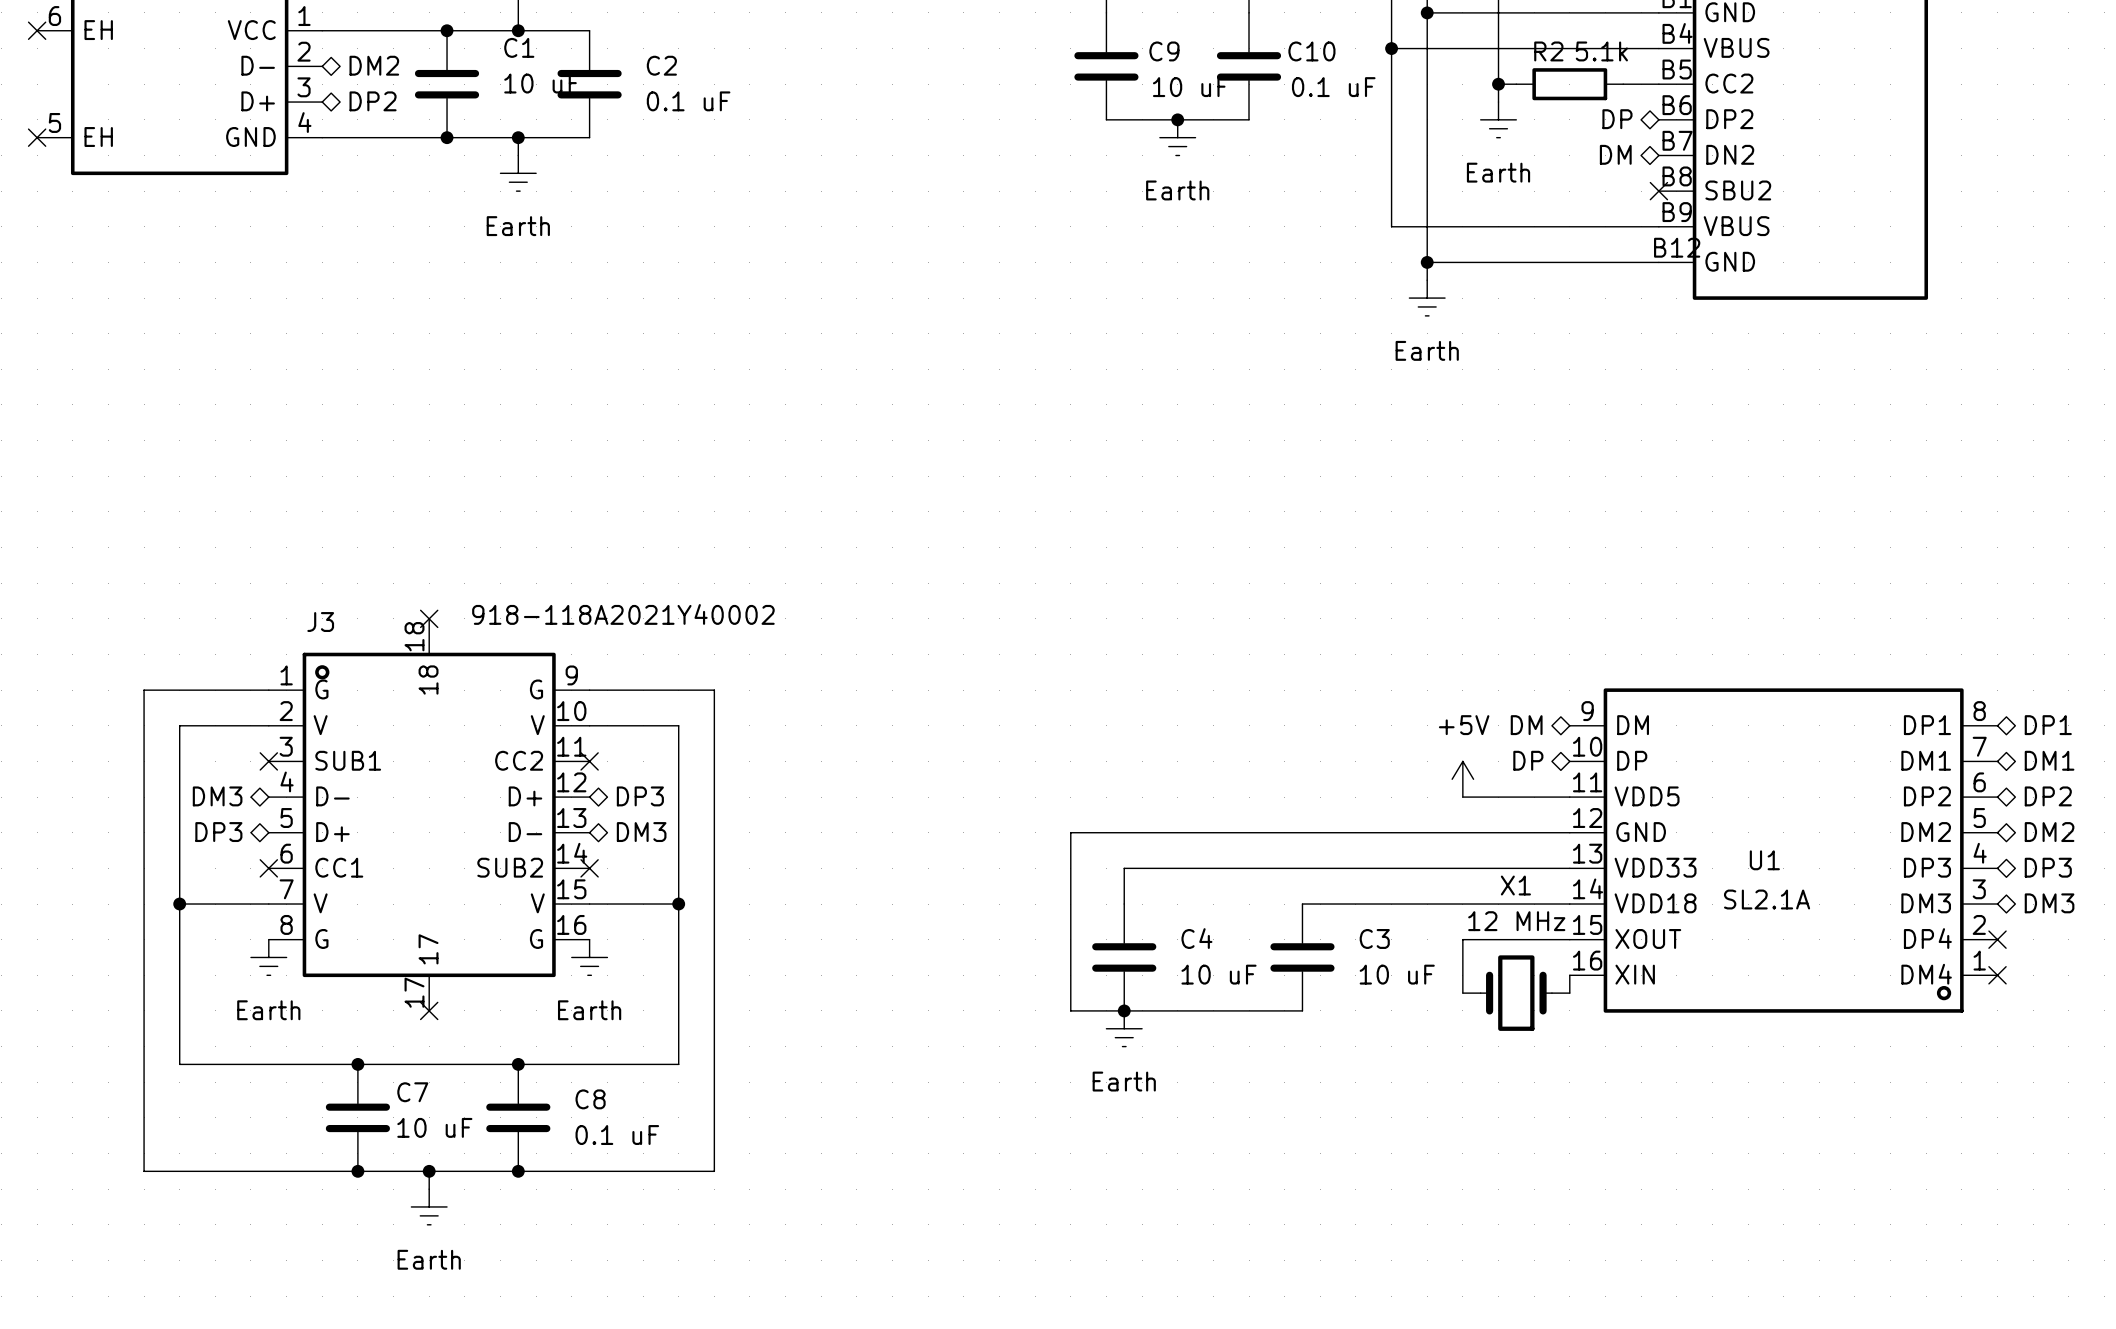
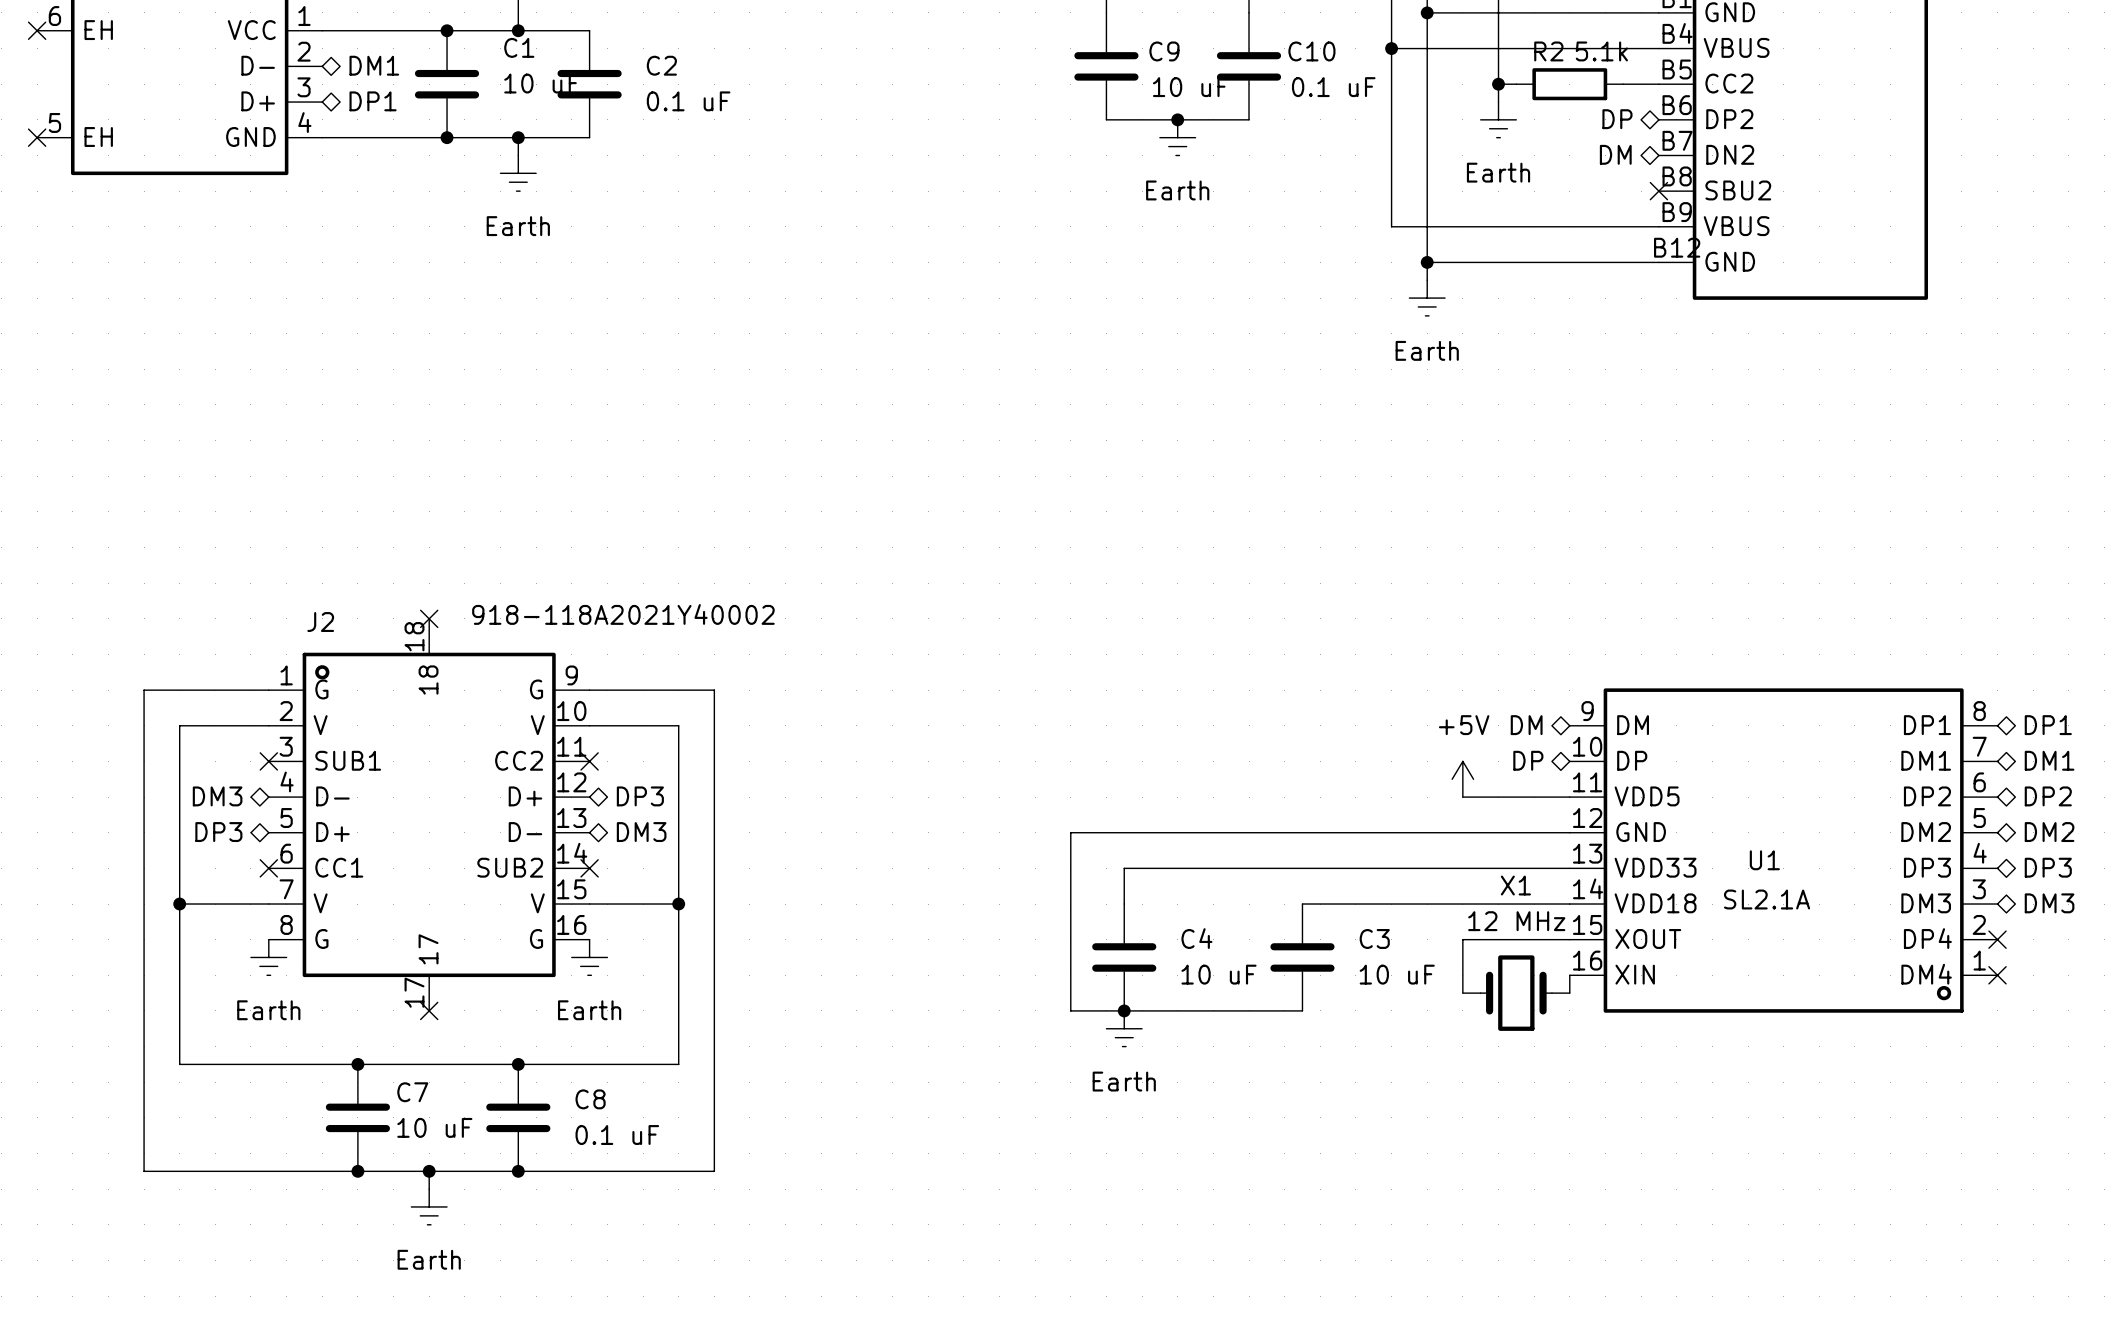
hierarchical label: DM2 (374, 65) -> DM1 (374, 65)
hierarchical label: DP2 (373, 101) -> DP1 (373, 101)
J3 name: J3 (320, 622) -> J2 (320, 622)

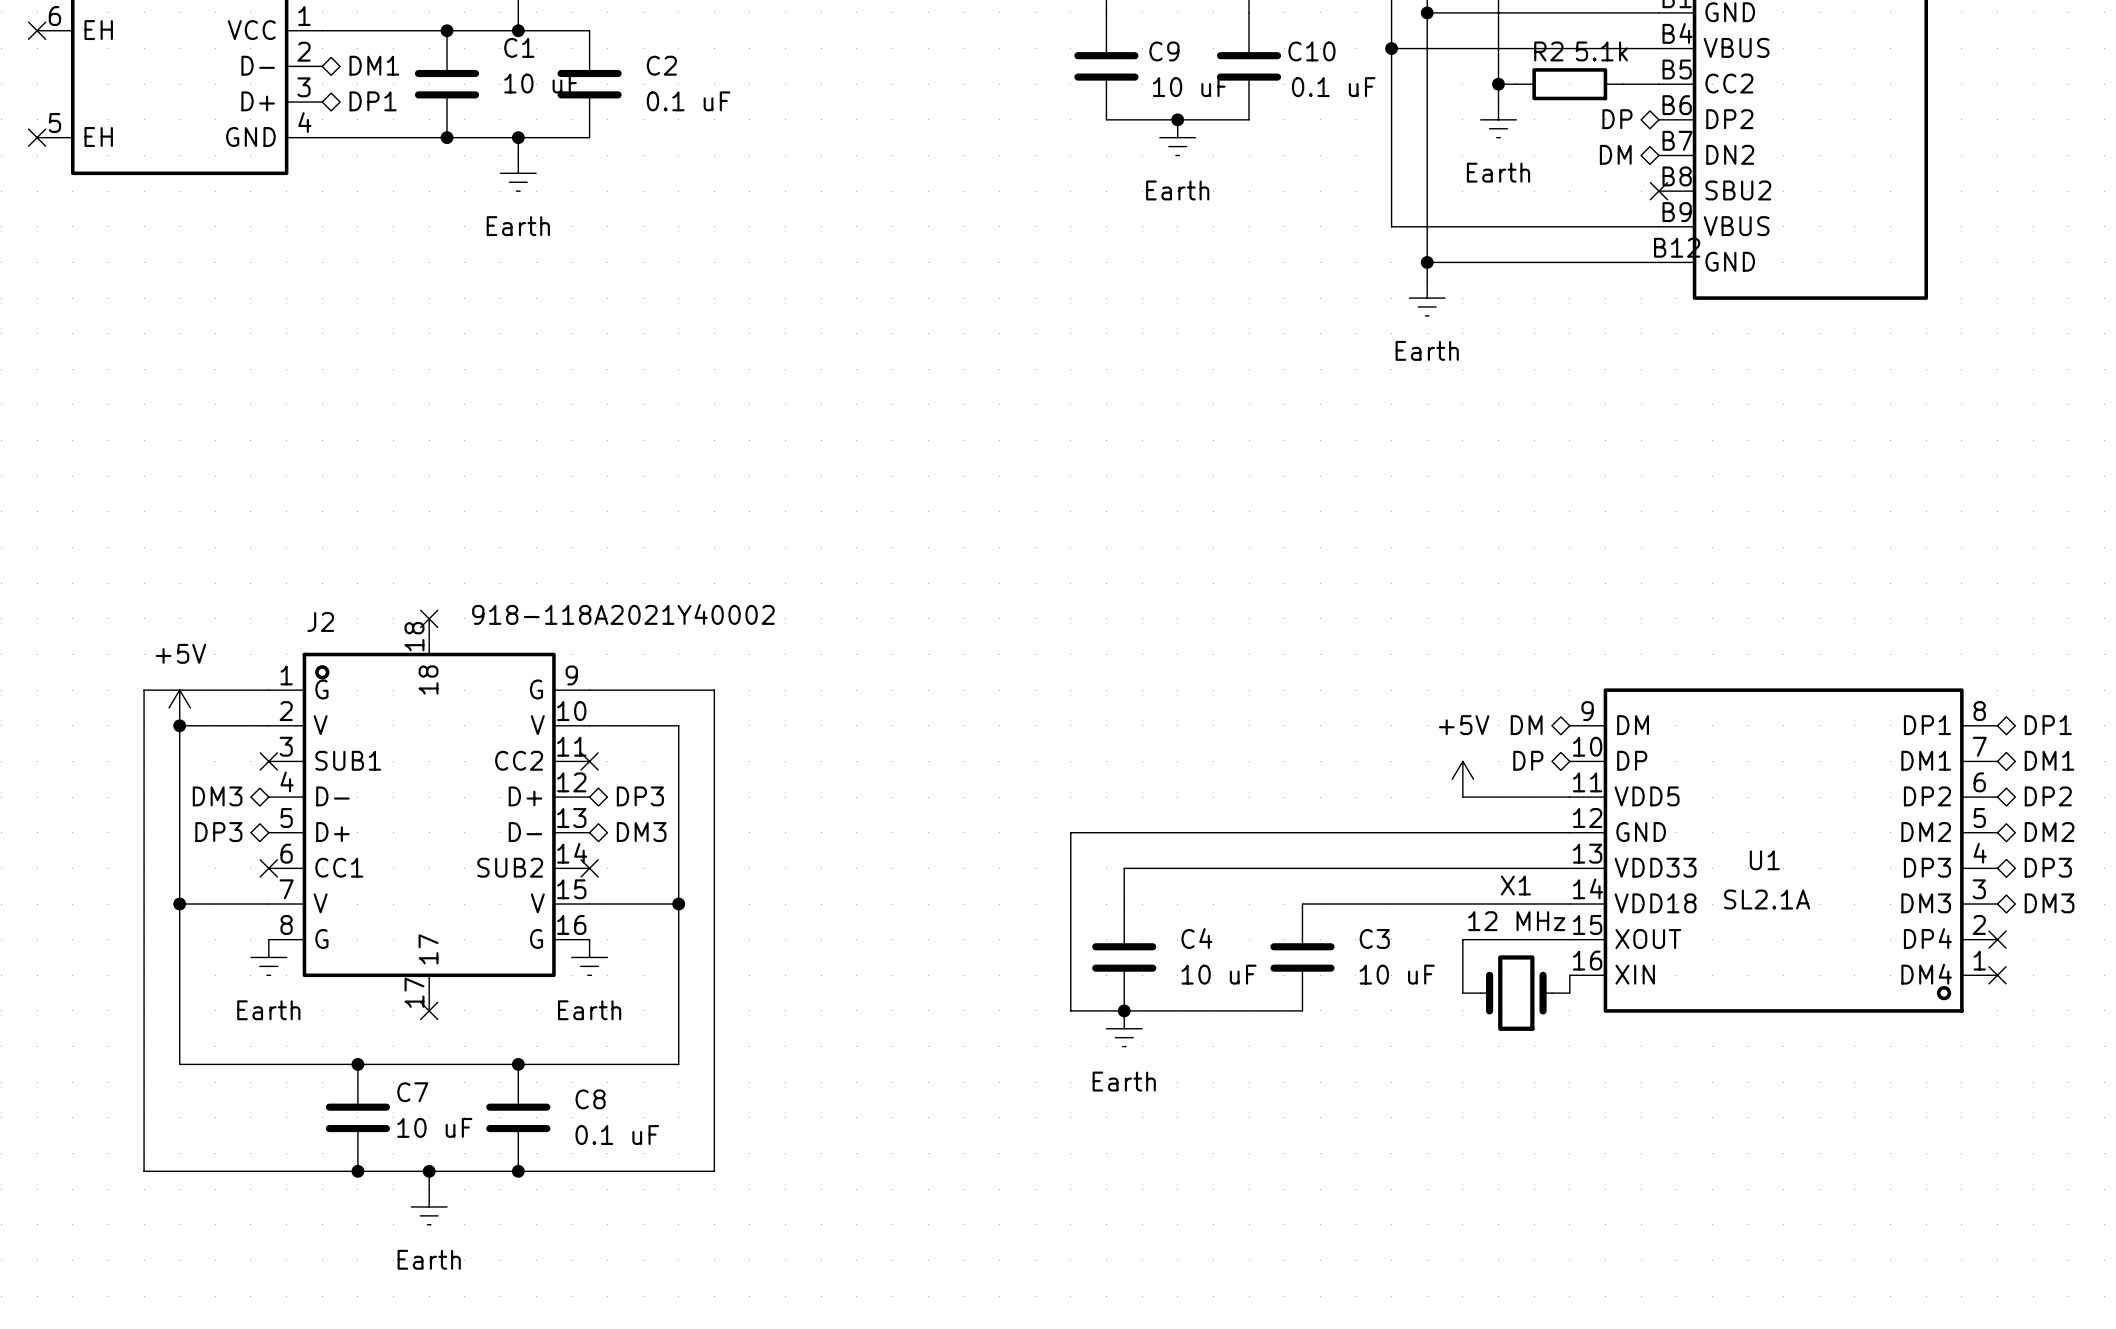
power symbol: none -> +5V (179, 707)
junction: none -> (179, 725)

